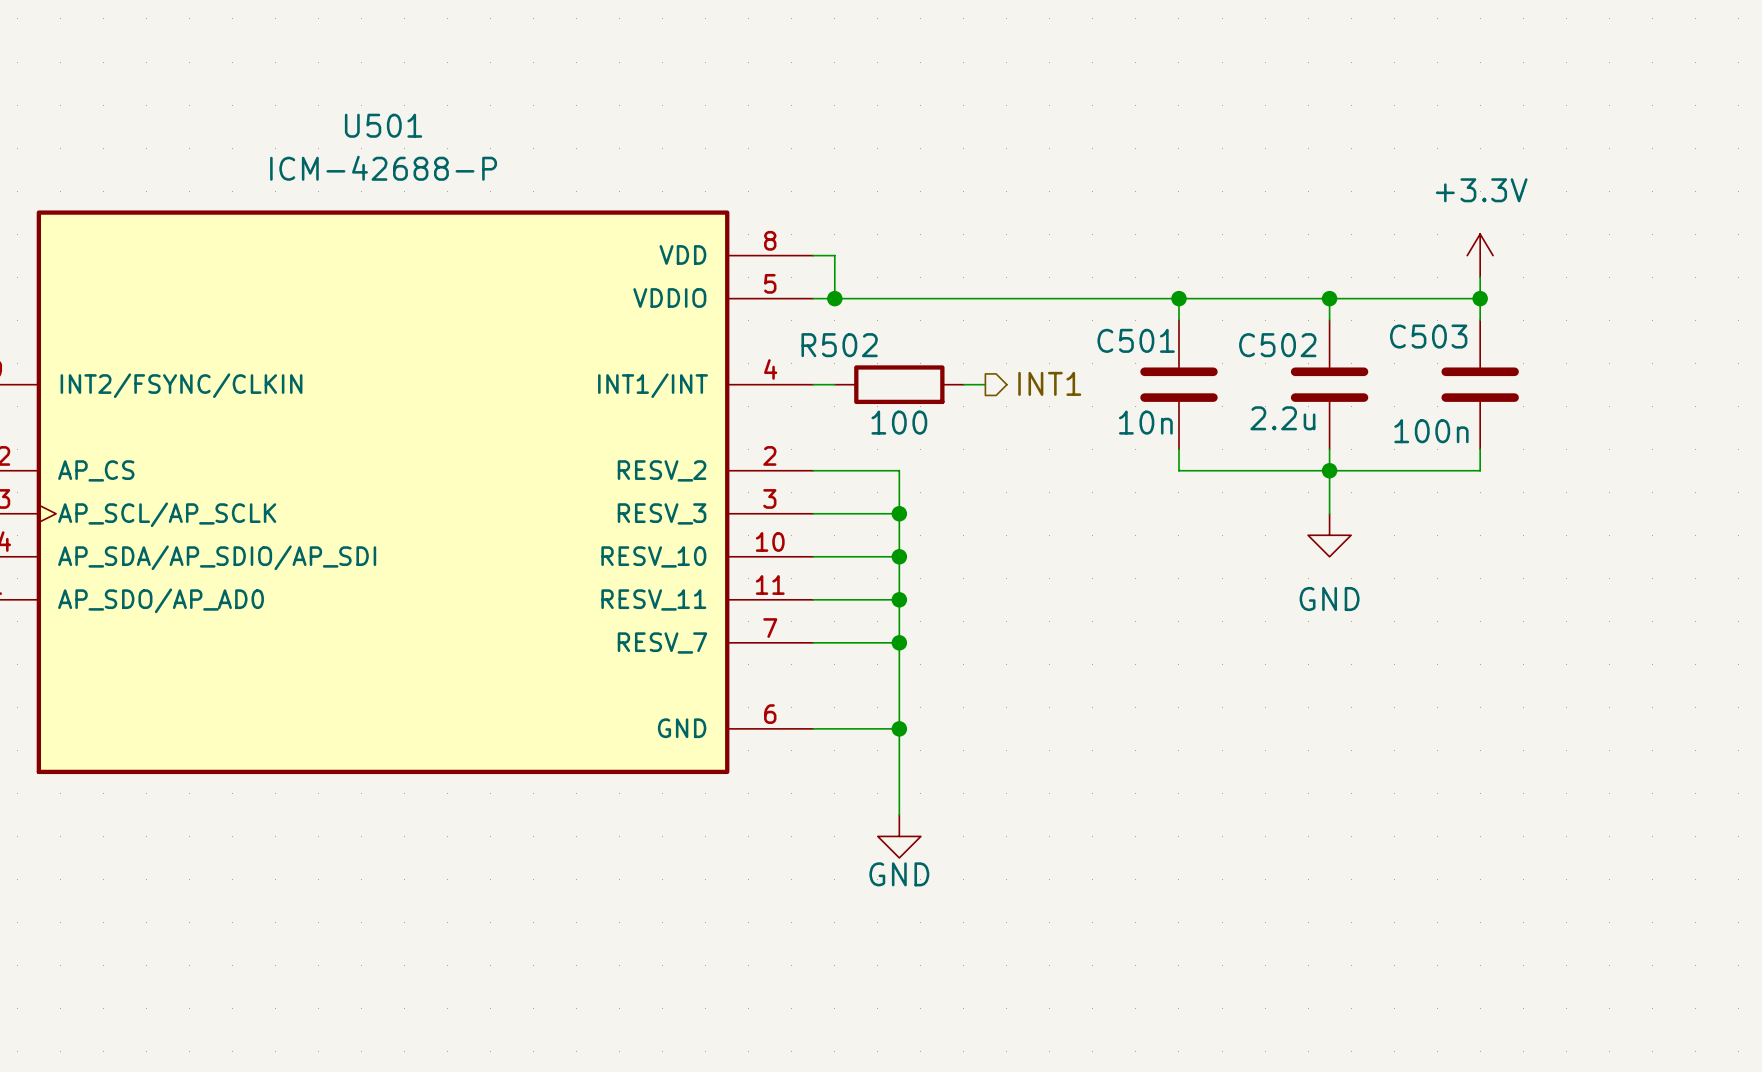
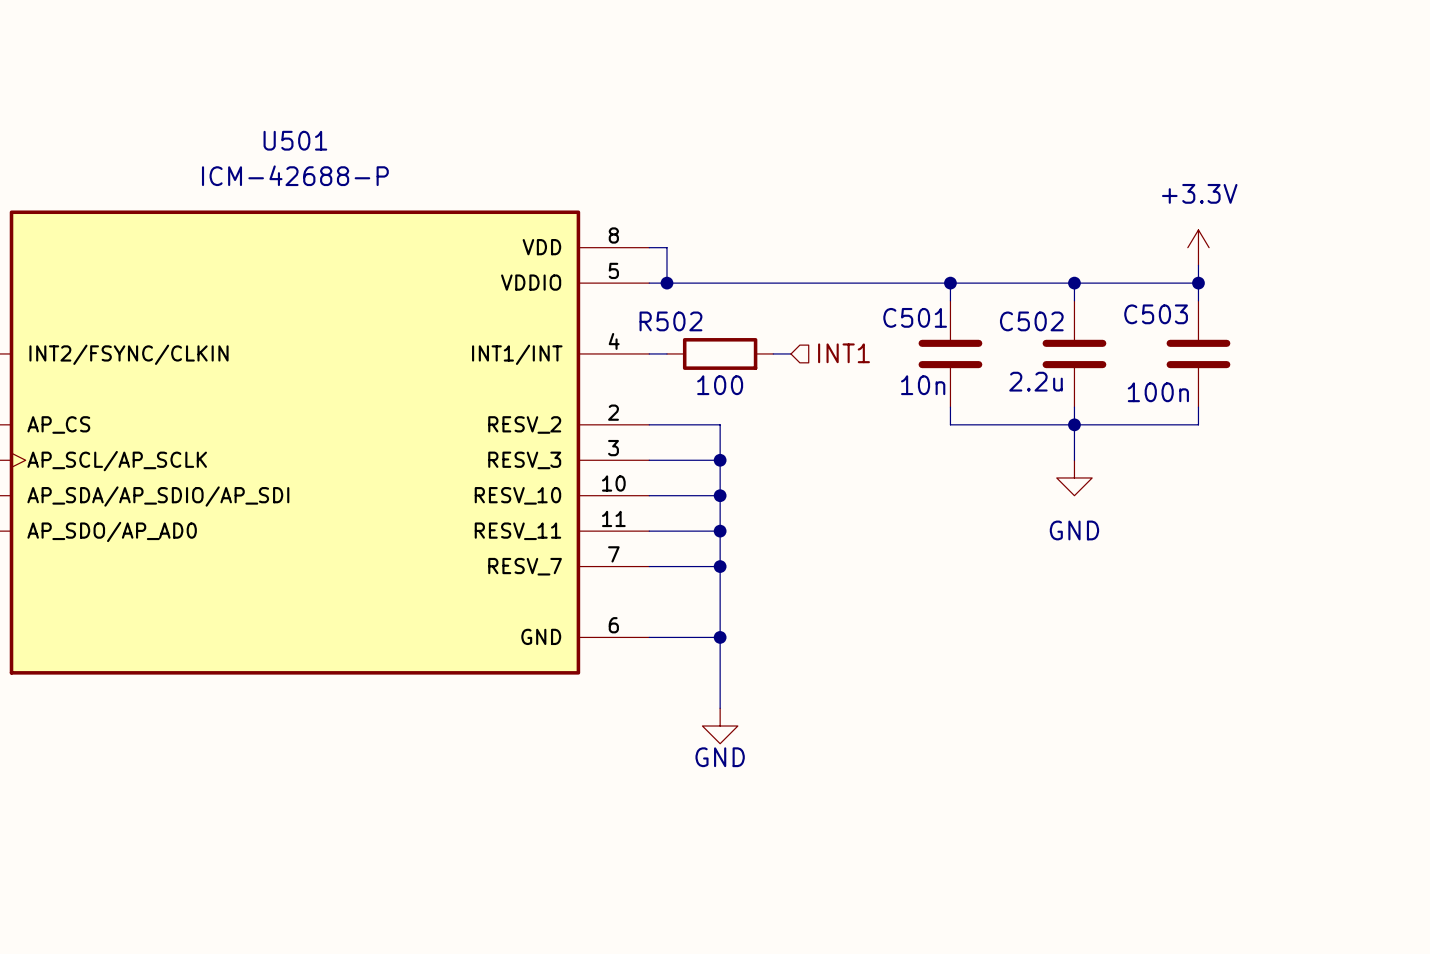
hierarchical label shape: output (1049, 383) -> input (844, 353)

